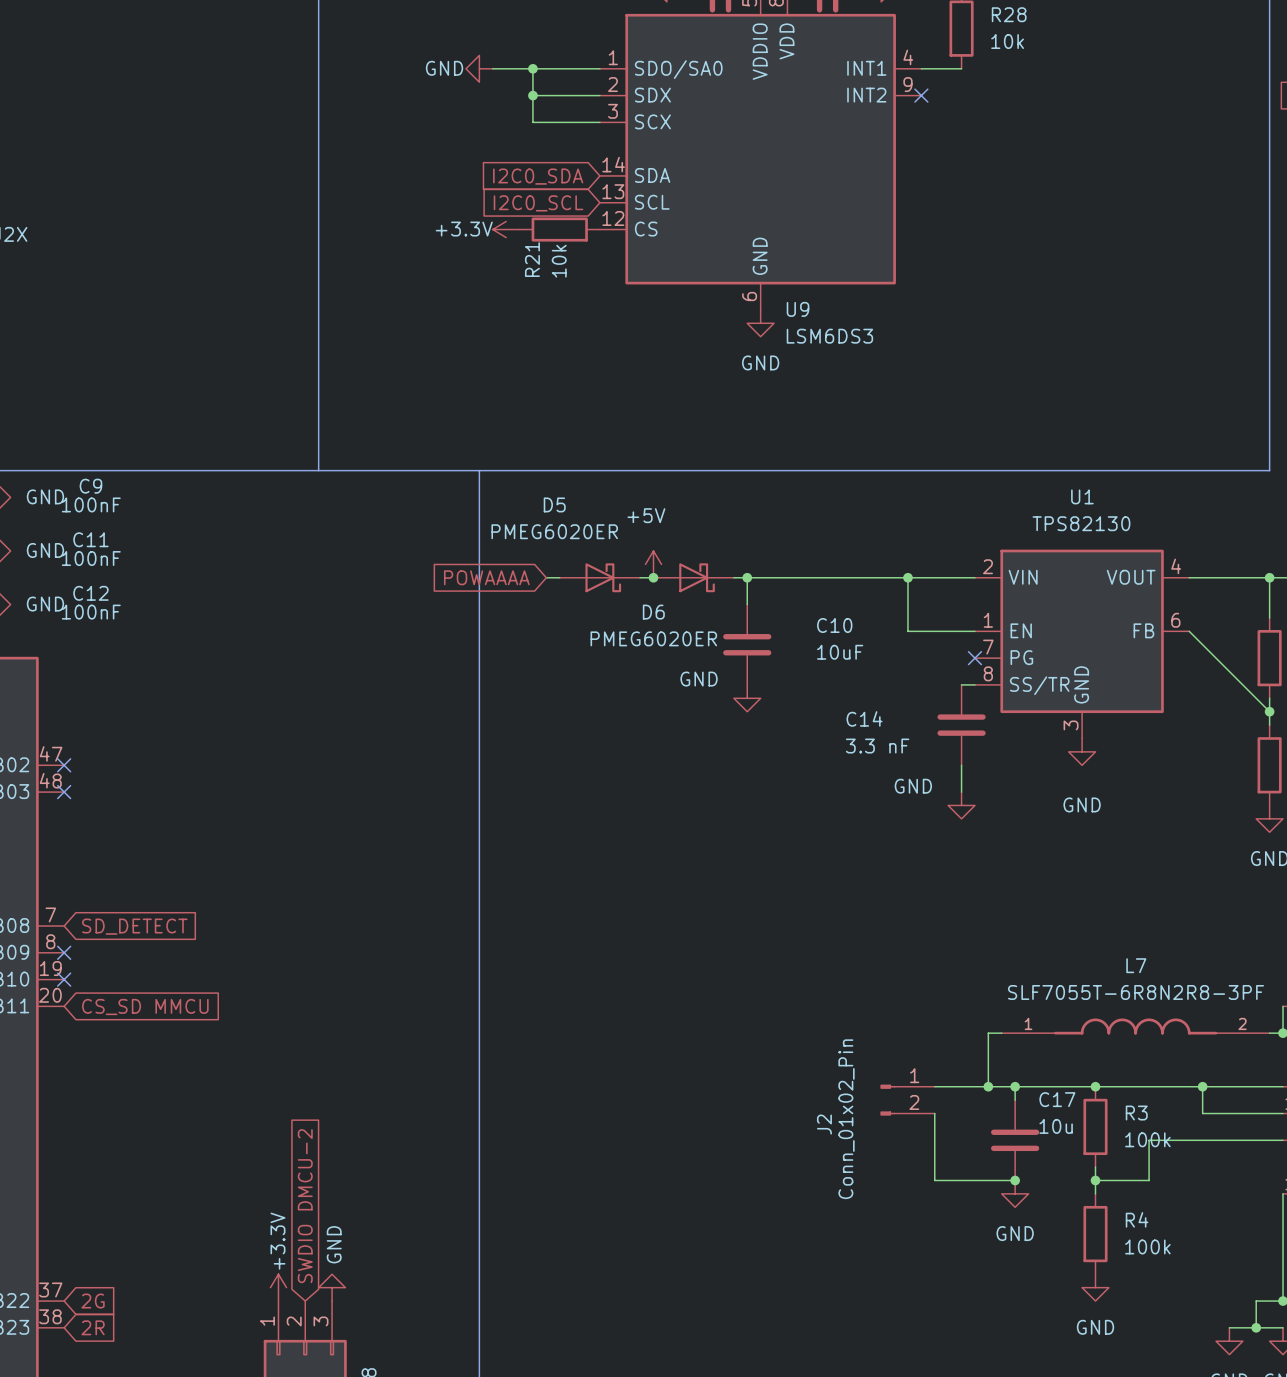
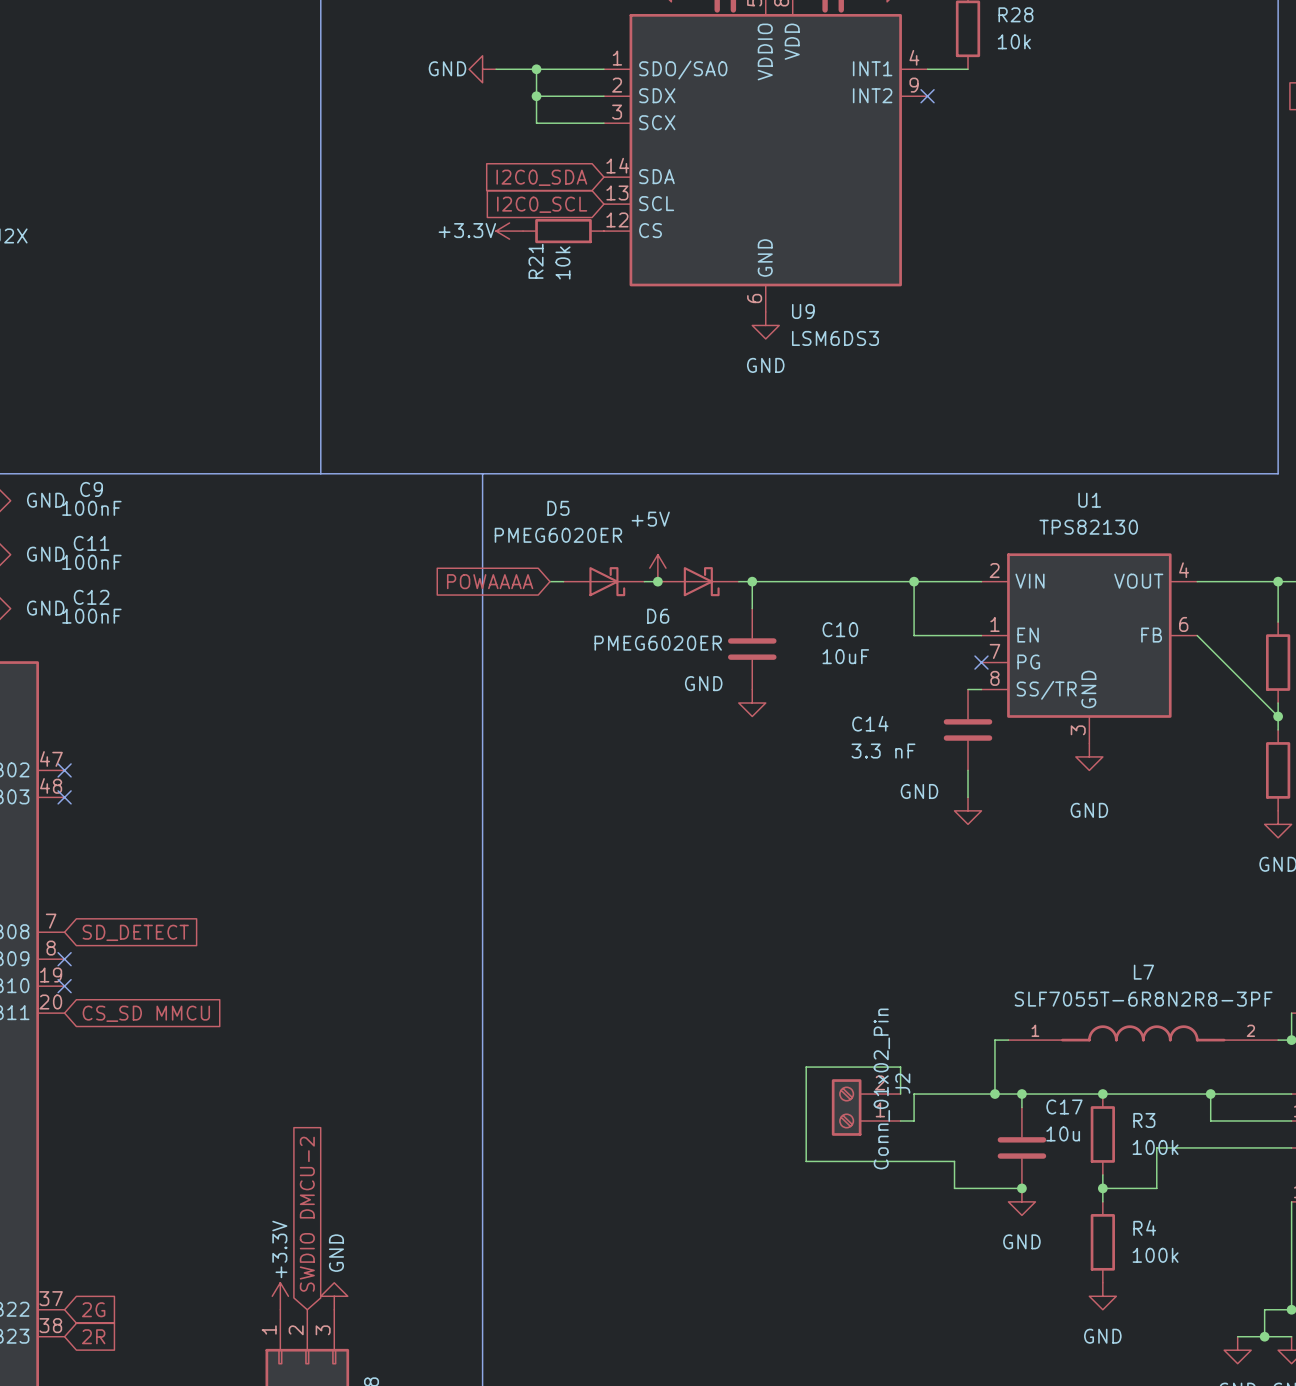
J2 symbol: [880, 1084, 935, 1116] -> [831, 1079, 901, 1136]
wire: none -> (941, 1094) (914, 1094) (914, 1120) (900, 1120)
wire: (934, 1113) (934, 1180) (948, 1180) -> (900, 1094) (900, 1067) (806, 1067) (806, 1161) (954, 1161) (954, 1188)
J2 value position: Conn_01x02_Pin (846, 1119) -> Conn_01x02_Pin (881, 1088)
J2 name position: J2 (824, 1124) -> J2 (902, 1083)

